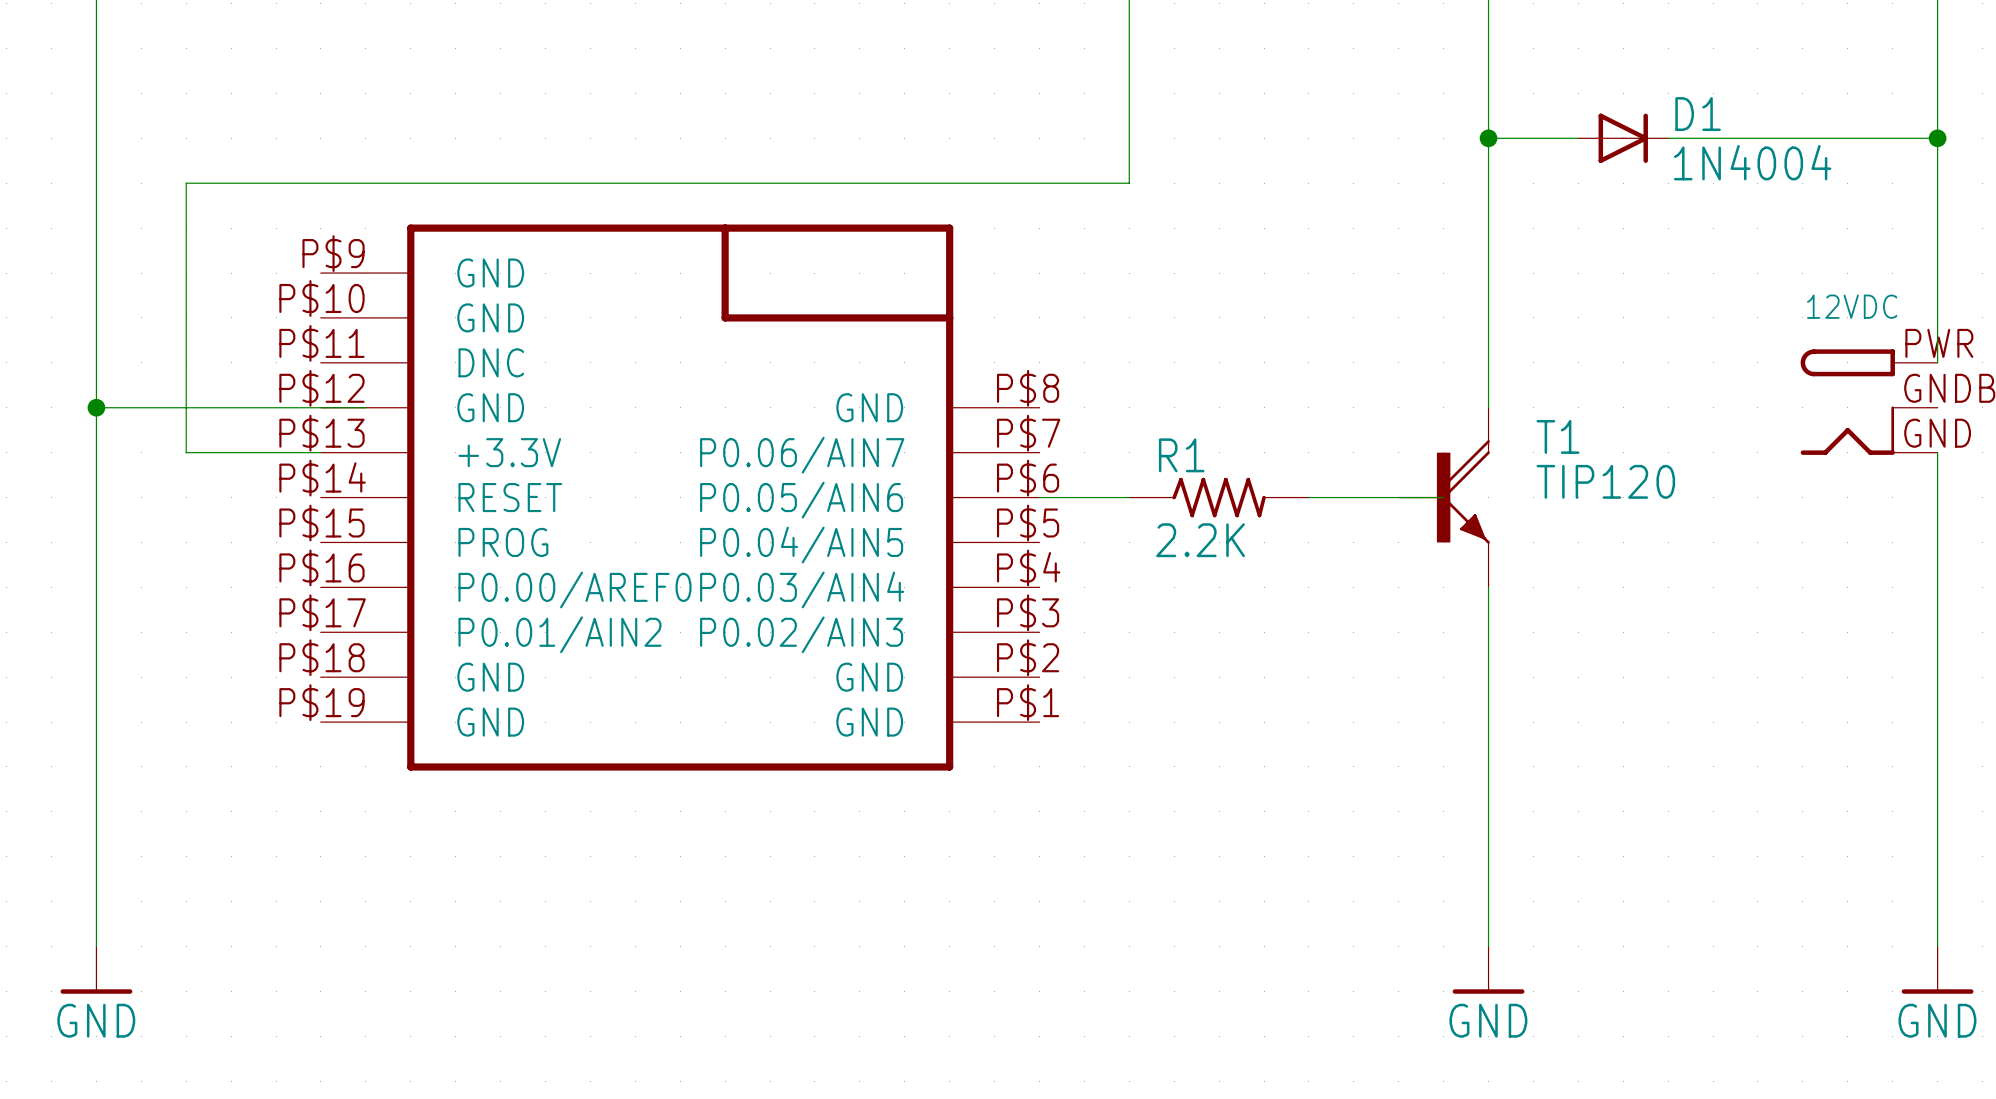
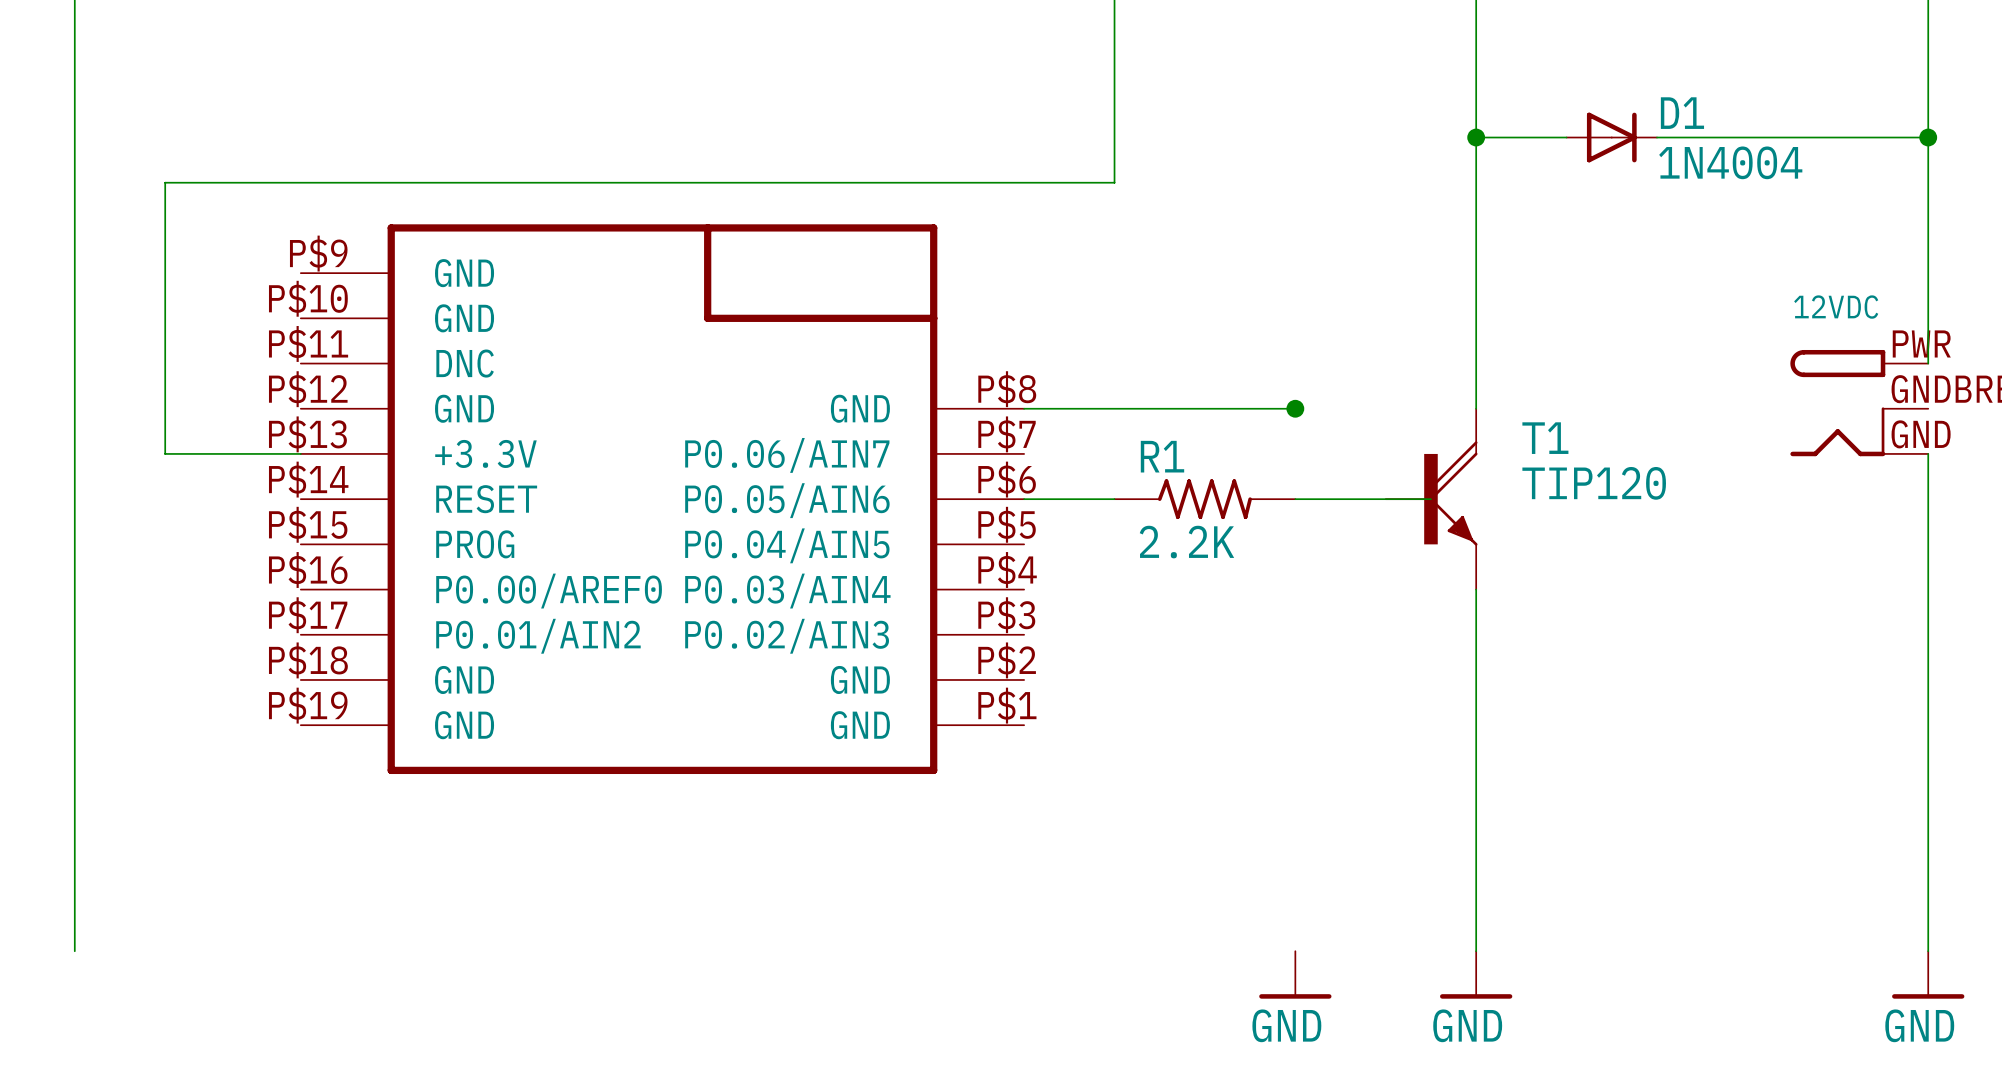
wire: (96, 407) (365, 407) -> none
junction: (96, 407) -> none
wire: none -> (1024, 408) (1295, 408)
junction: none -> (1295, 408)
power symbol: GND (96, 970) -> none
power symbol: none -> GND (1295, 974)

